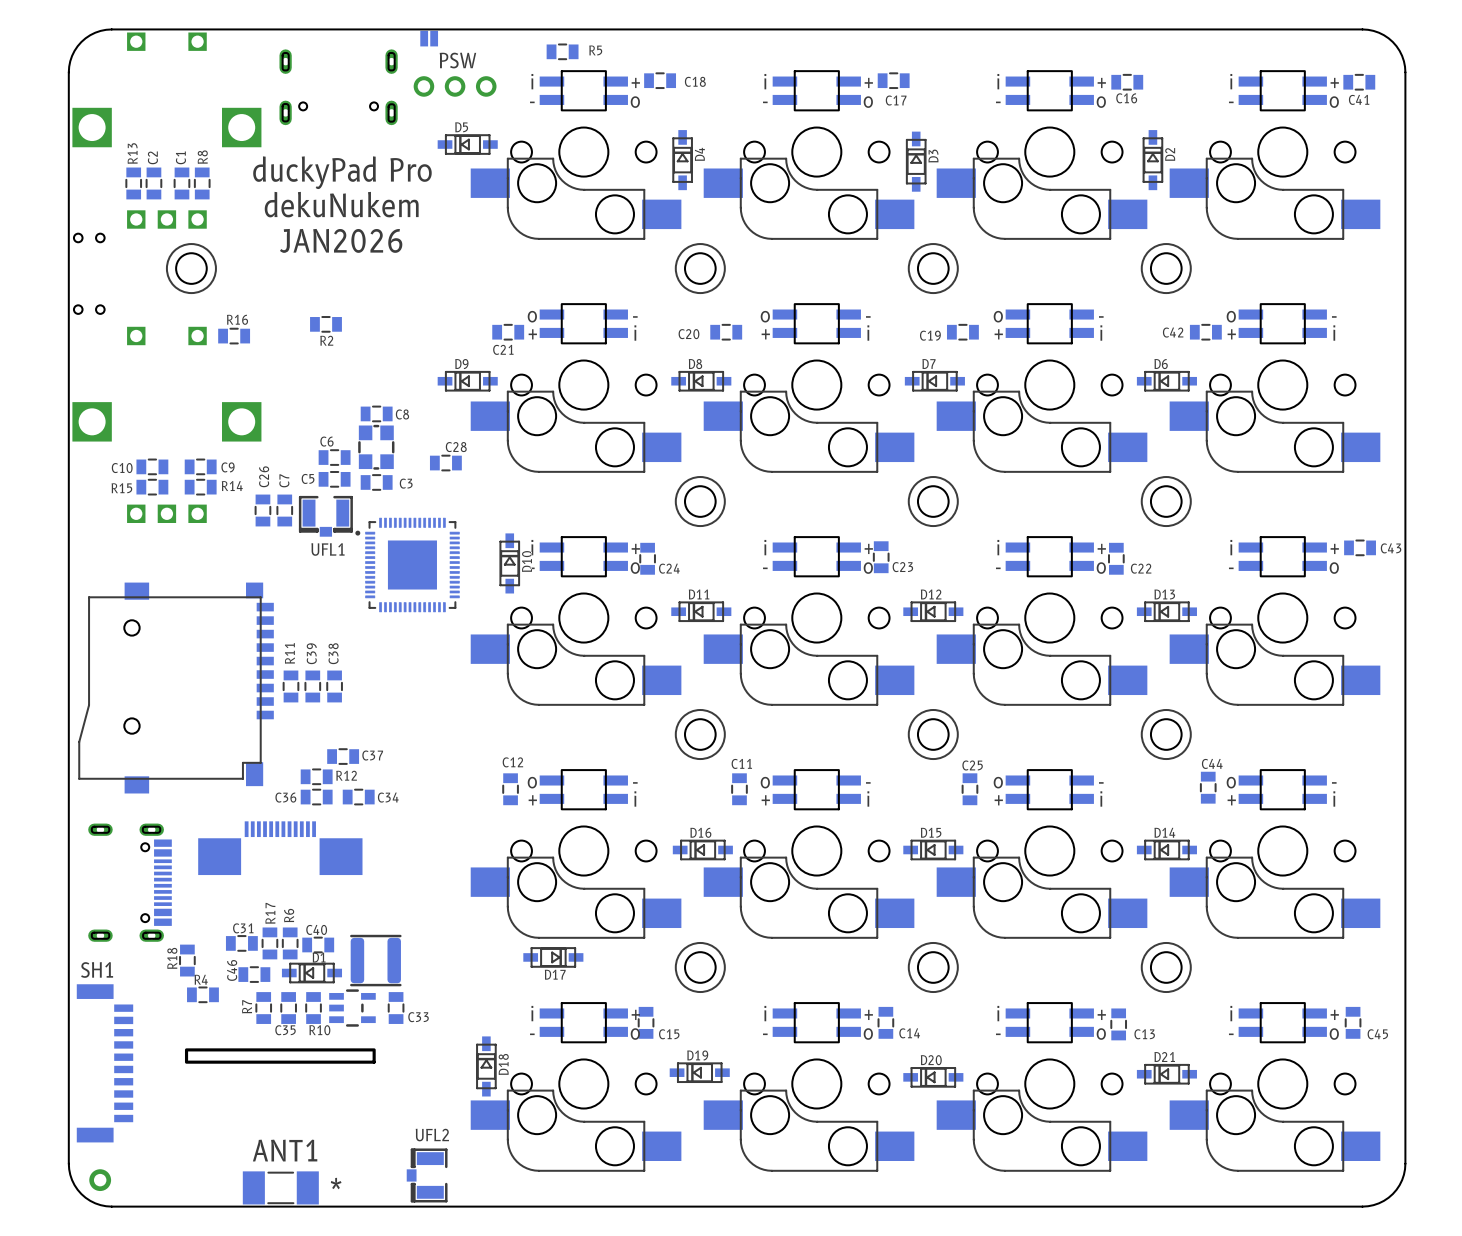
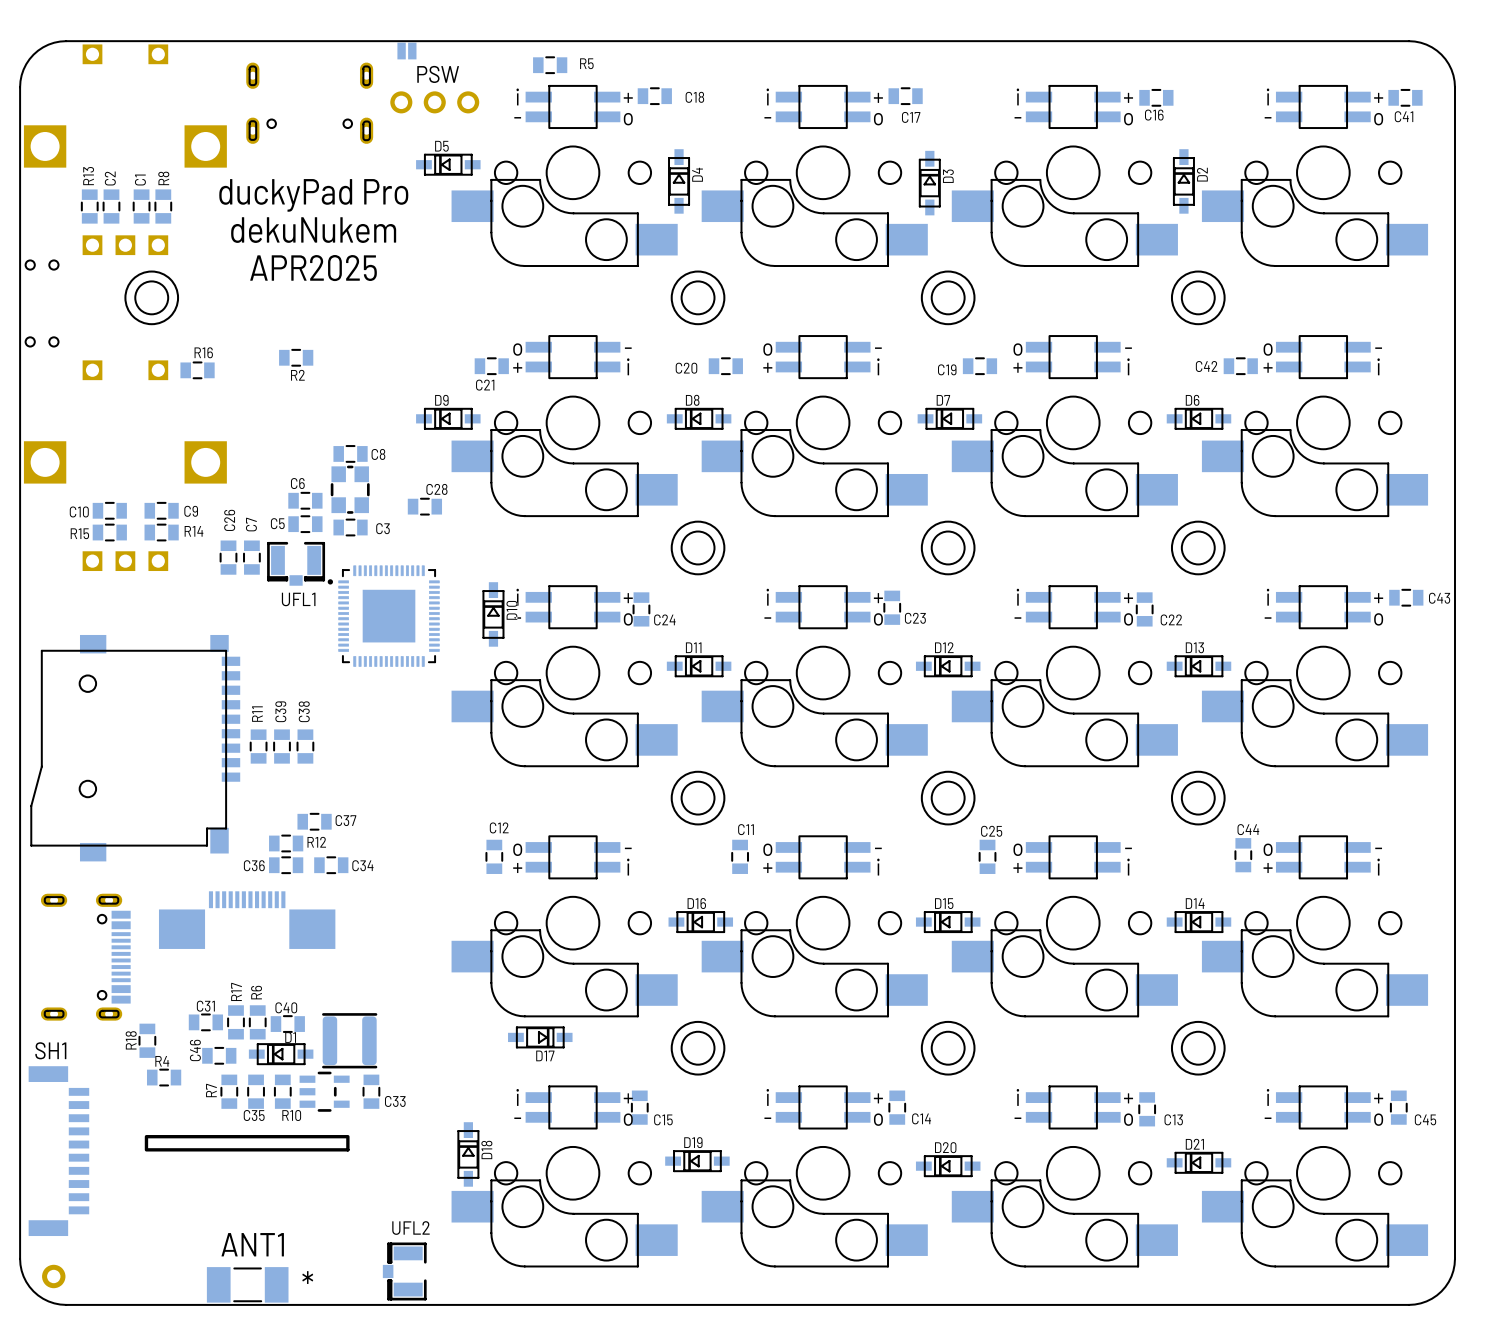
text: JAN2026 (341, 240) -> APR2025 (313, 268)

